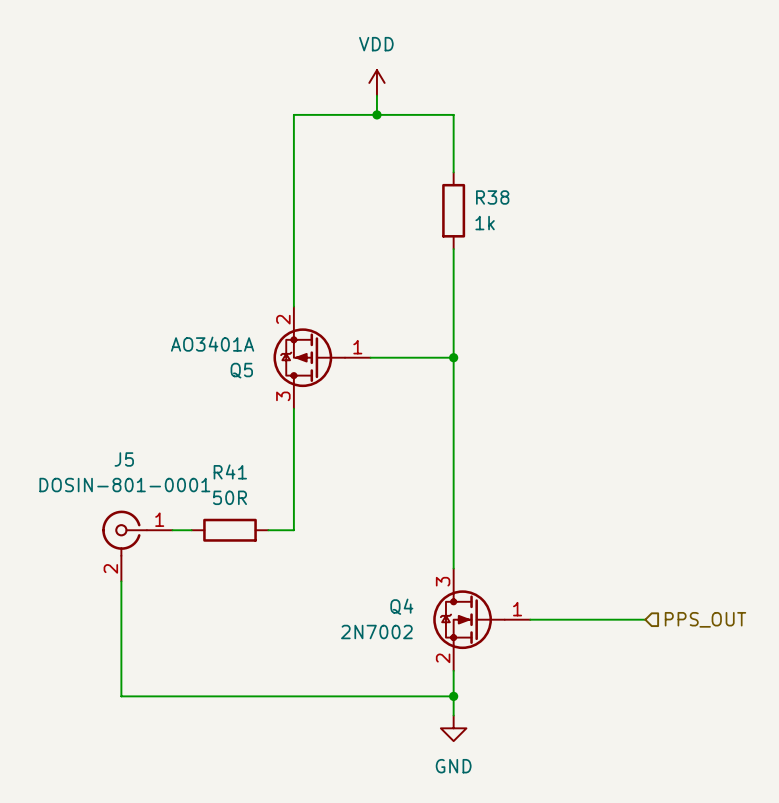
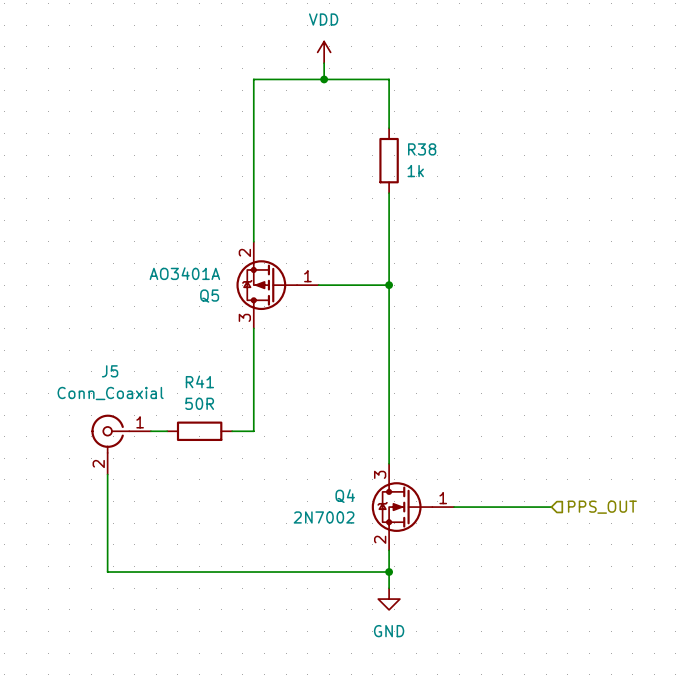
J5 value: DOSIN-801-0001 (124, 485) -> Conn_Coaxial (110, 393)

